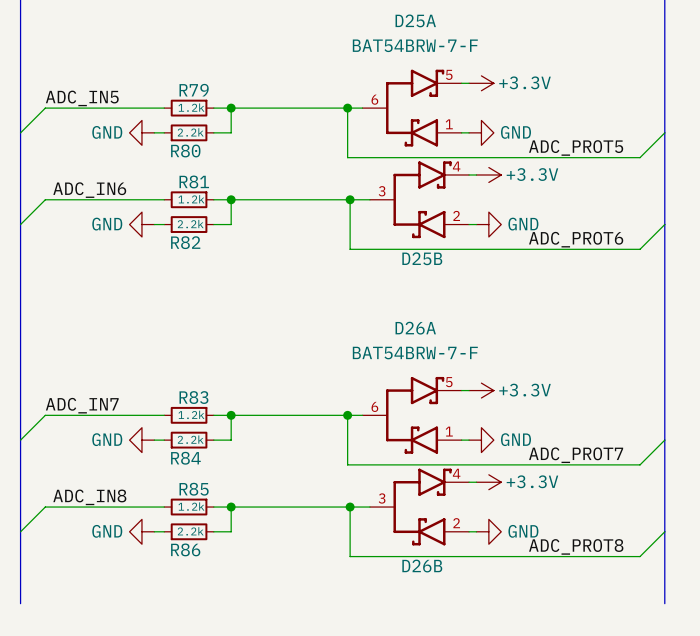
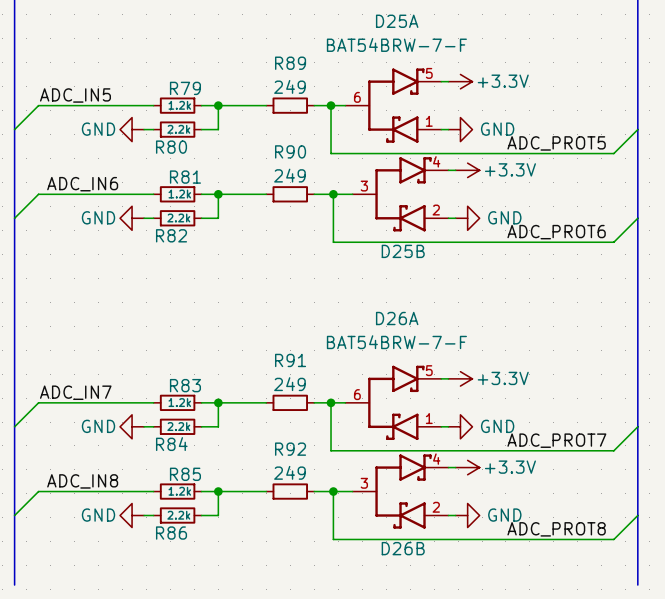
wire: (280, 108) (330, 108) -> none
R89: none -> 249 (290, 105)
wire: (280, 199) (330, 199) -> none
R90: none -> 249 (290, 194)
wire: (280, 415) (330, 415) -> none
R91: none -> 249 (290, 402)
wire: (280, 507) (330, 507) -> none
R92: none -> 249 (290, 491)

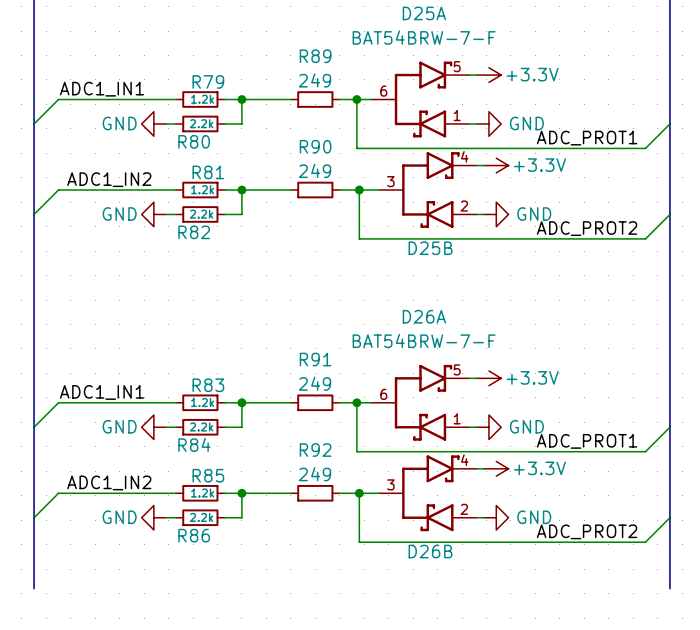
label: ADC_IN5 (75, 95) -> ADC1_IN1 (101, 89)
label: ADC_PROT5 (556, 143) -> ADC_PROT1 (587, 138)
label: ADC_IN6 (82, 184) -> ADC1_IN2 (109, 179)
label: ADC_PROT6 (556, 232) -> ADC_PROT2 (587, 228)
label: ADC_IN7 (75, 392) -> ADC1_IN1 (101, 392)
label: ADC_PROT7 (556, 440) -> ADC_PROT1 (587, 441)
label: ADC_IN8 (82, 481) -> ADC1_IN2 (109, 482)
label: ADC_PROT8 (556, 529) -> ADC_PROT2 (587, 531)

